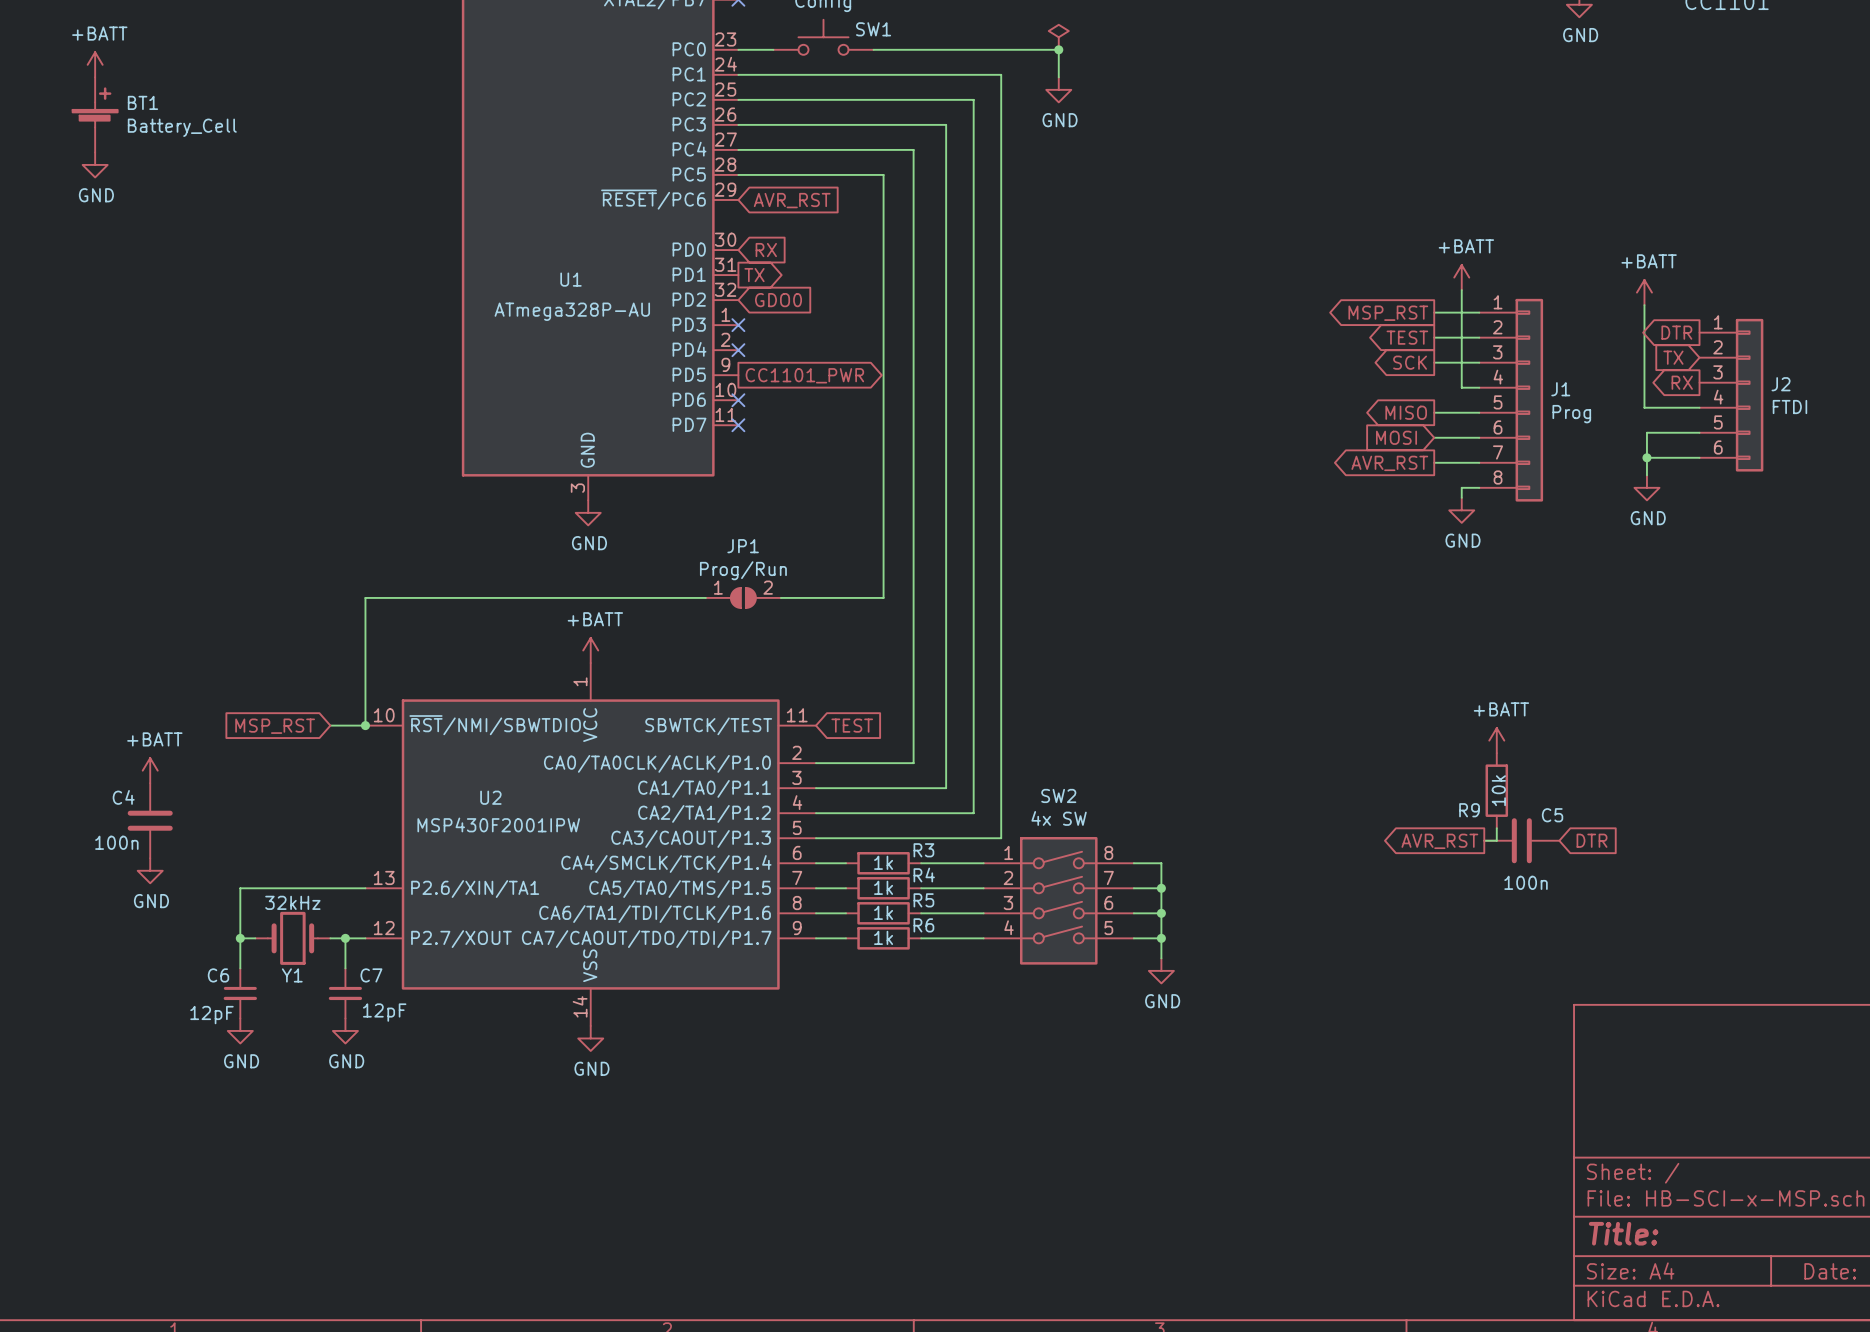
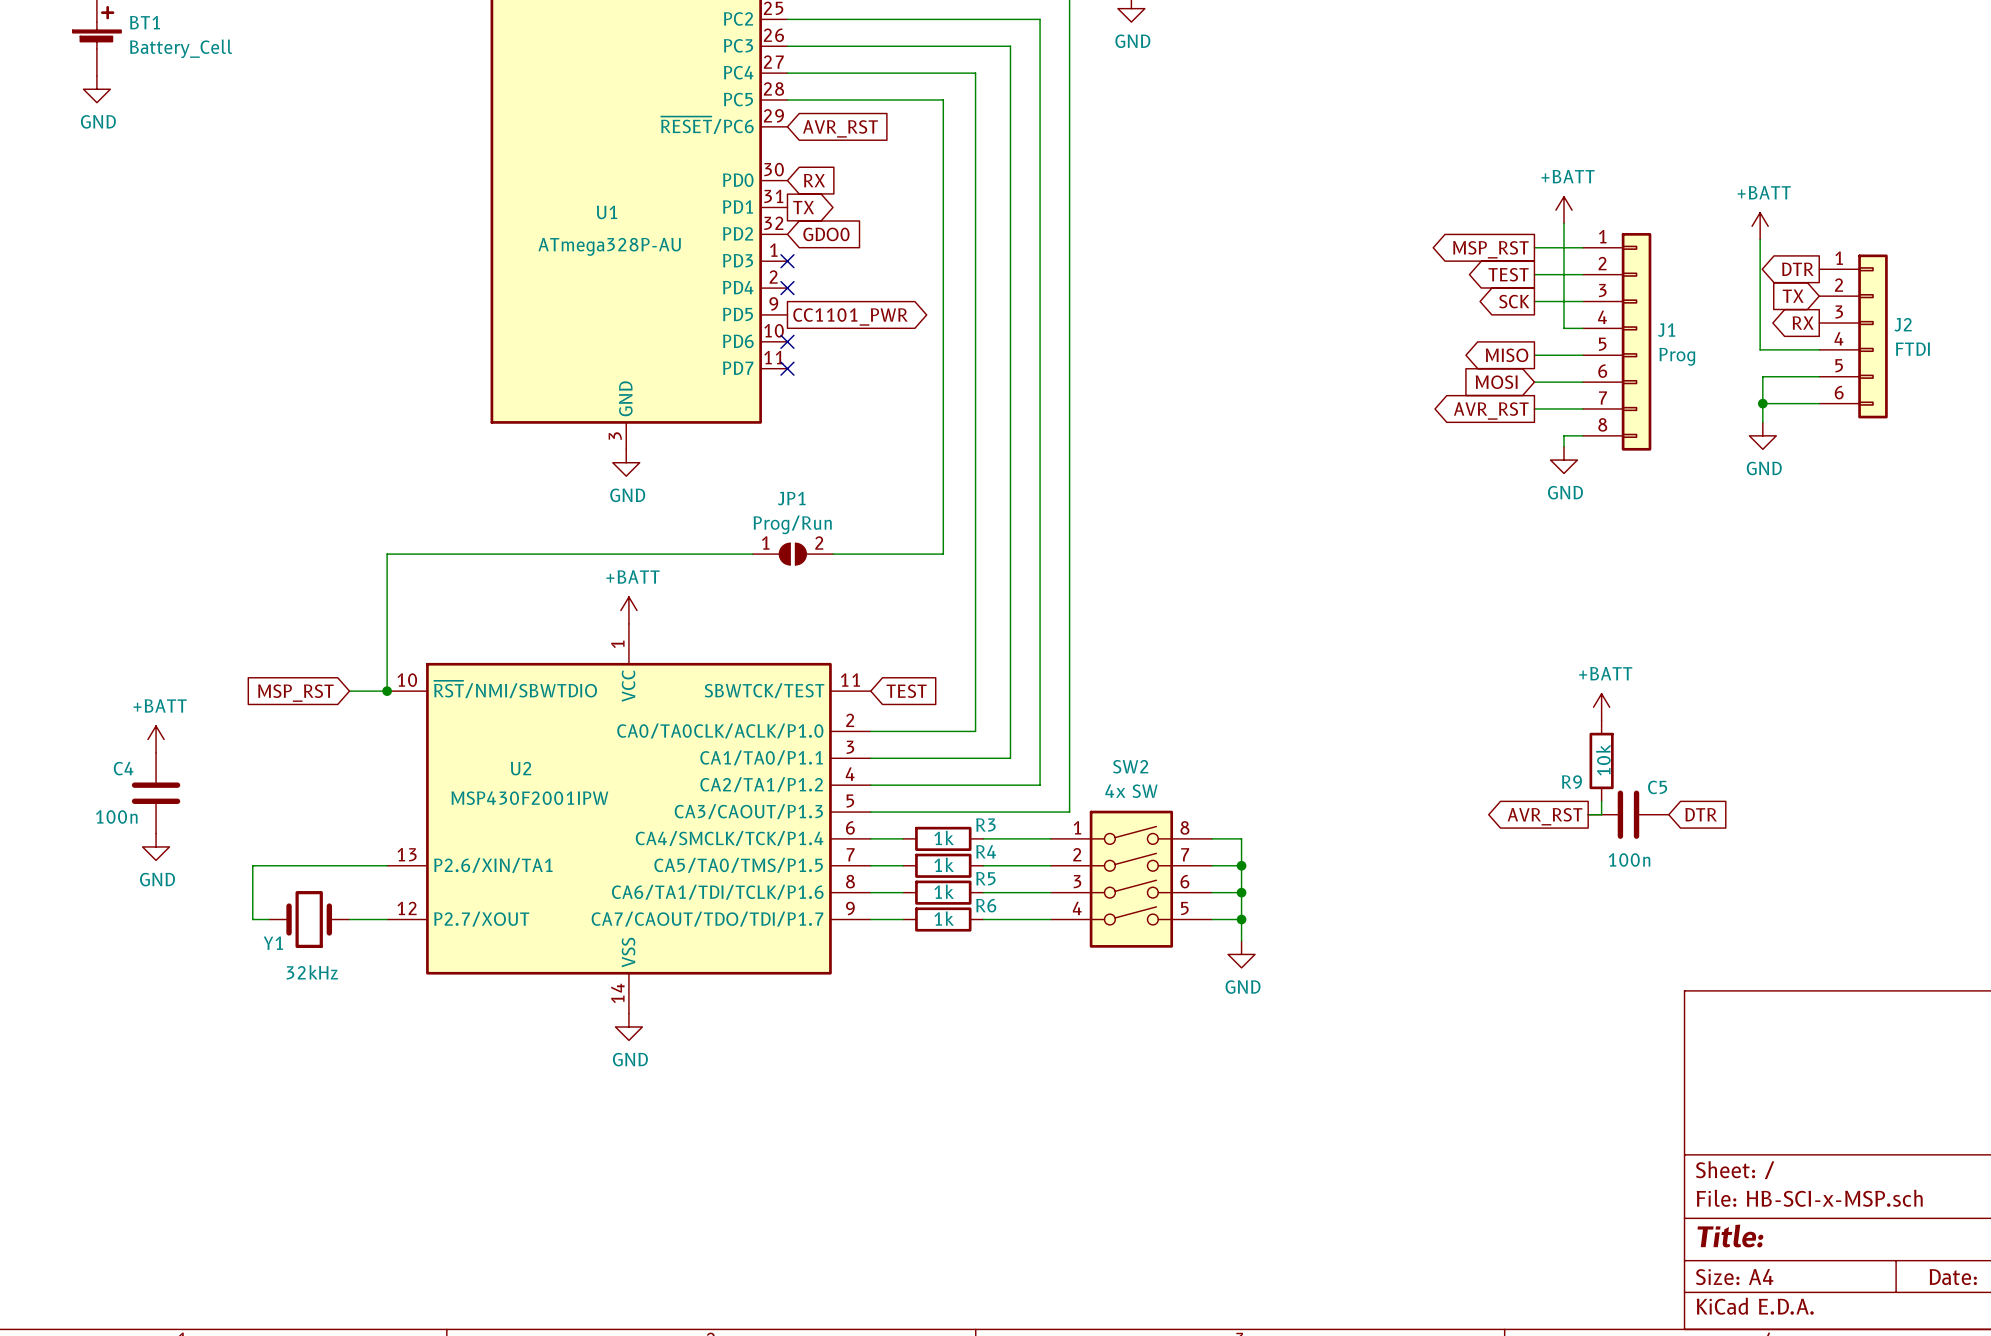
Y1 value position: 32kHz (292, 902) -> 32kHz (312, 972)
wire: (240, 938) (240, 968) -> none
junction: (240, 938) -> none
wire: (345, 938) (345, 968) -> none
junction: (345, 938) -> none
Y1 name position: Y1 (292, 975) -> Y1 (273, 943)
C6: 12pF (240, 993) -> none
C7: 12pF (345, 993) -> none
power symbol: GND (240, 1030) -> none
power symbol: GND (345, 1030) -> none

